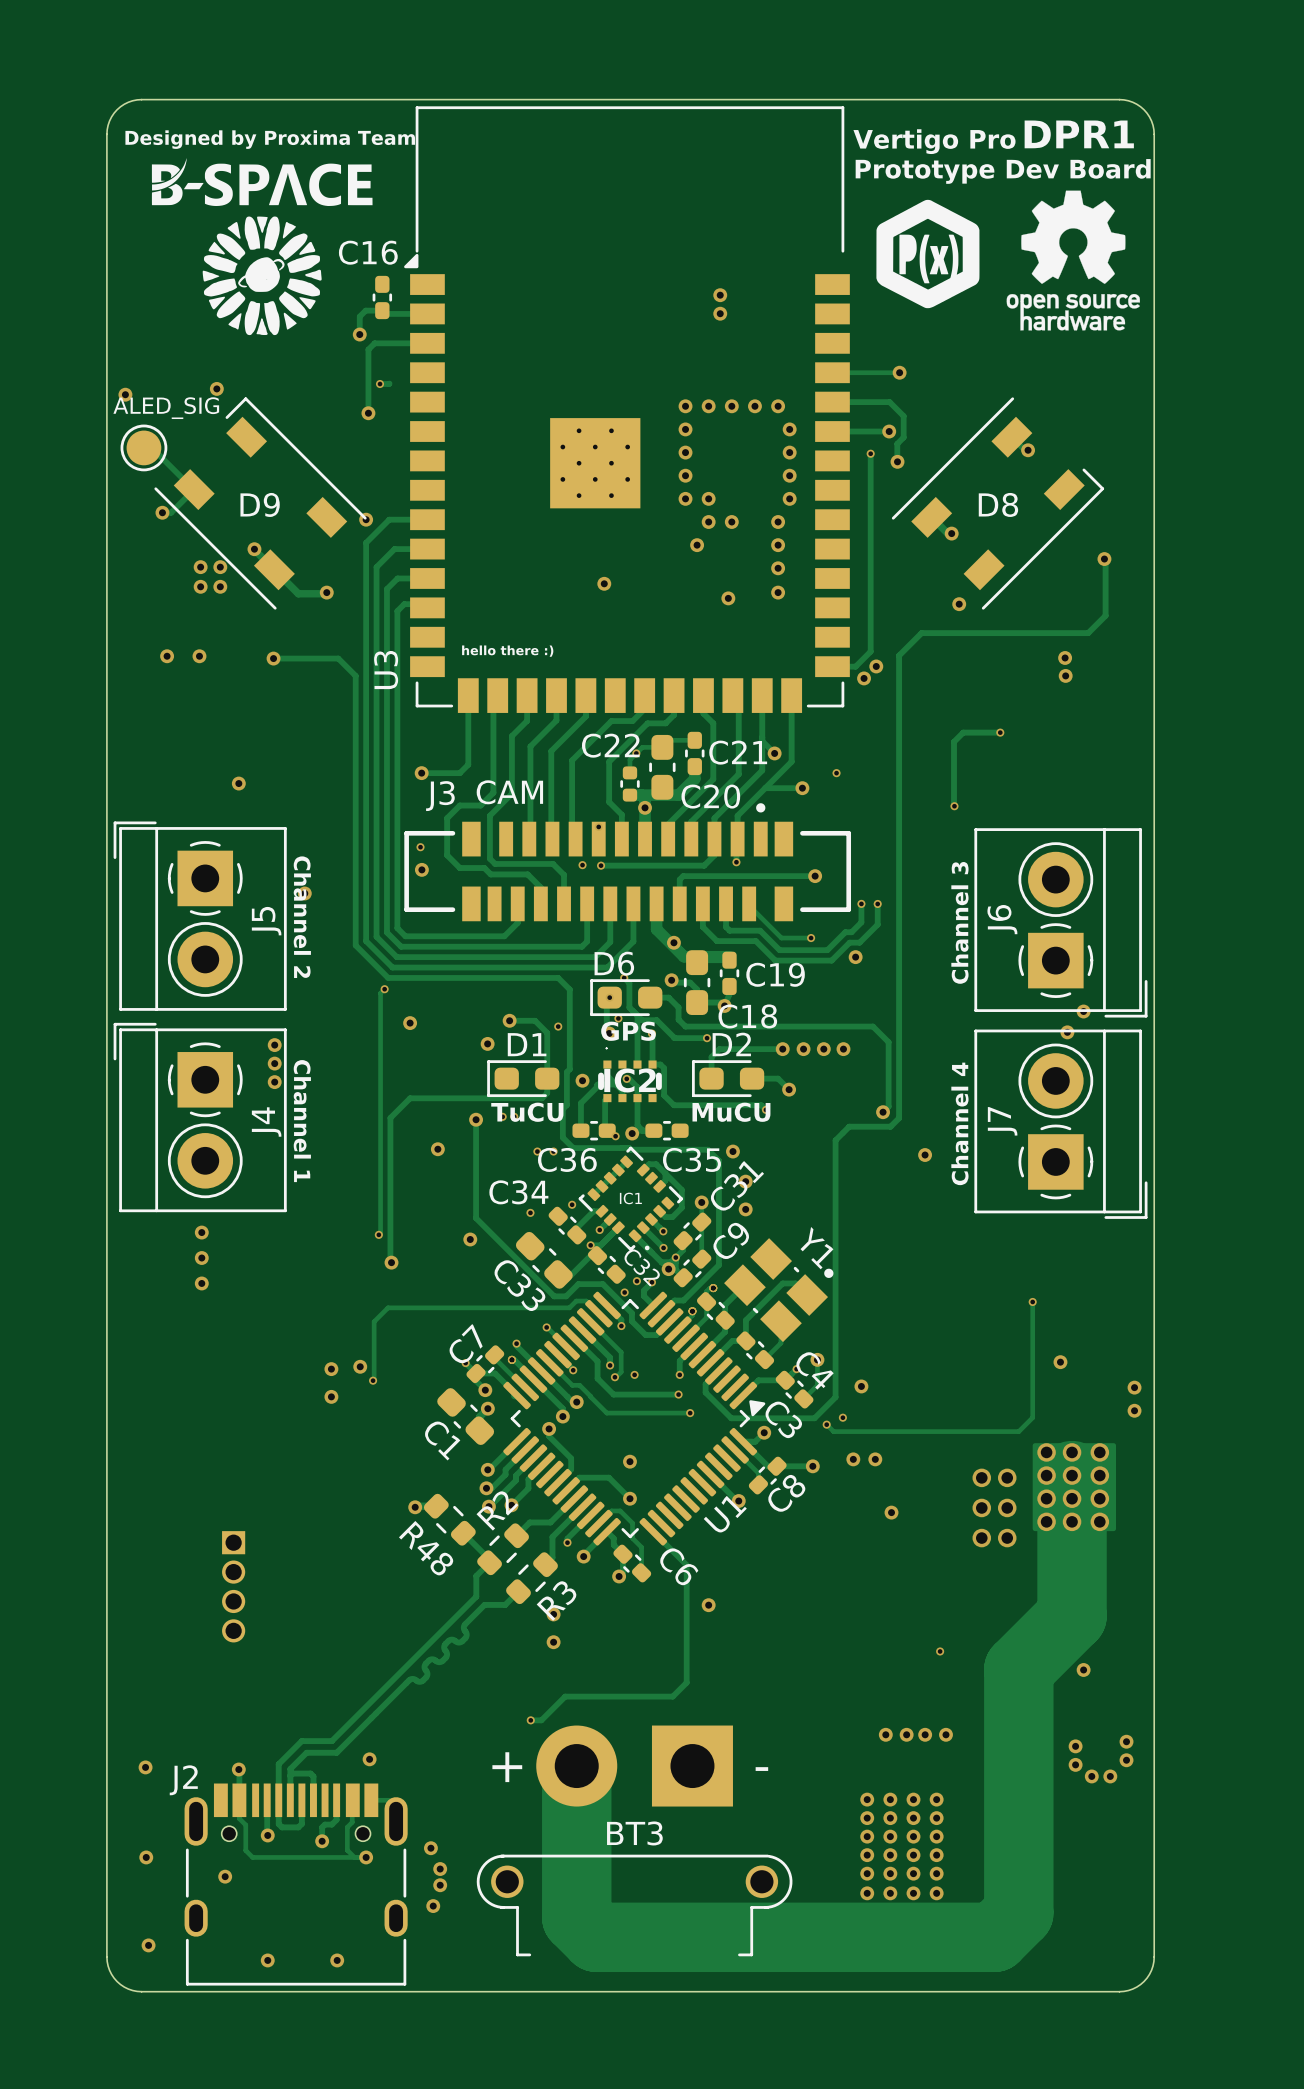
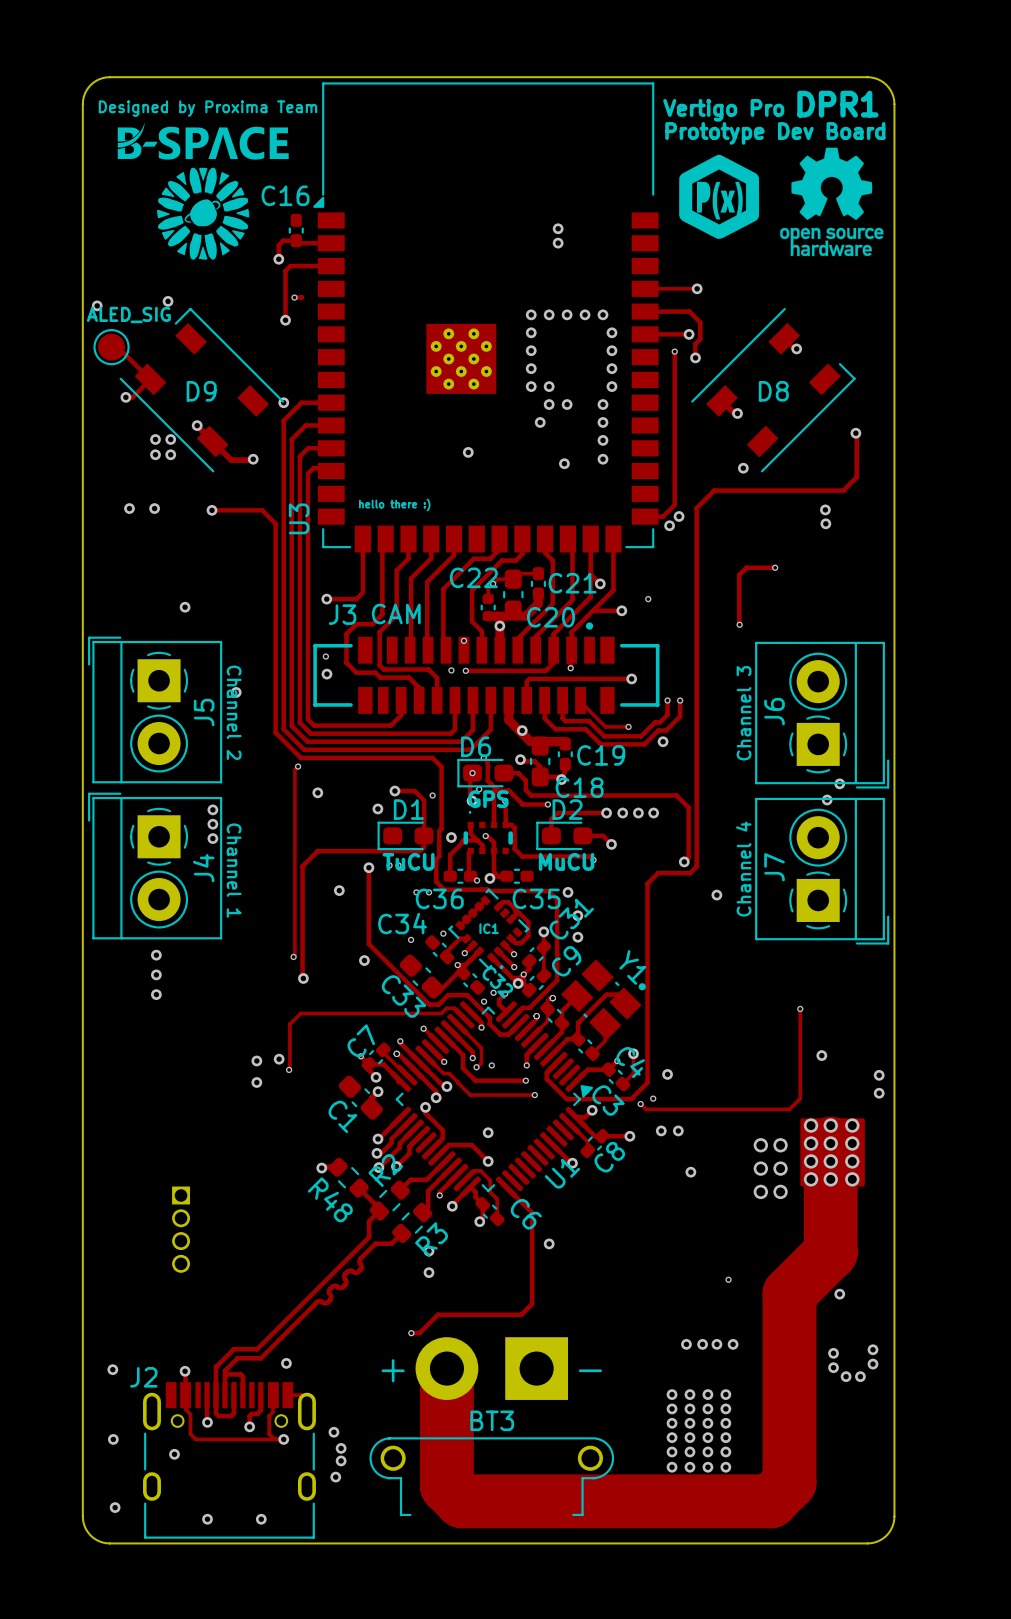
IC2 name: IC2 (630, 1080) -> none

